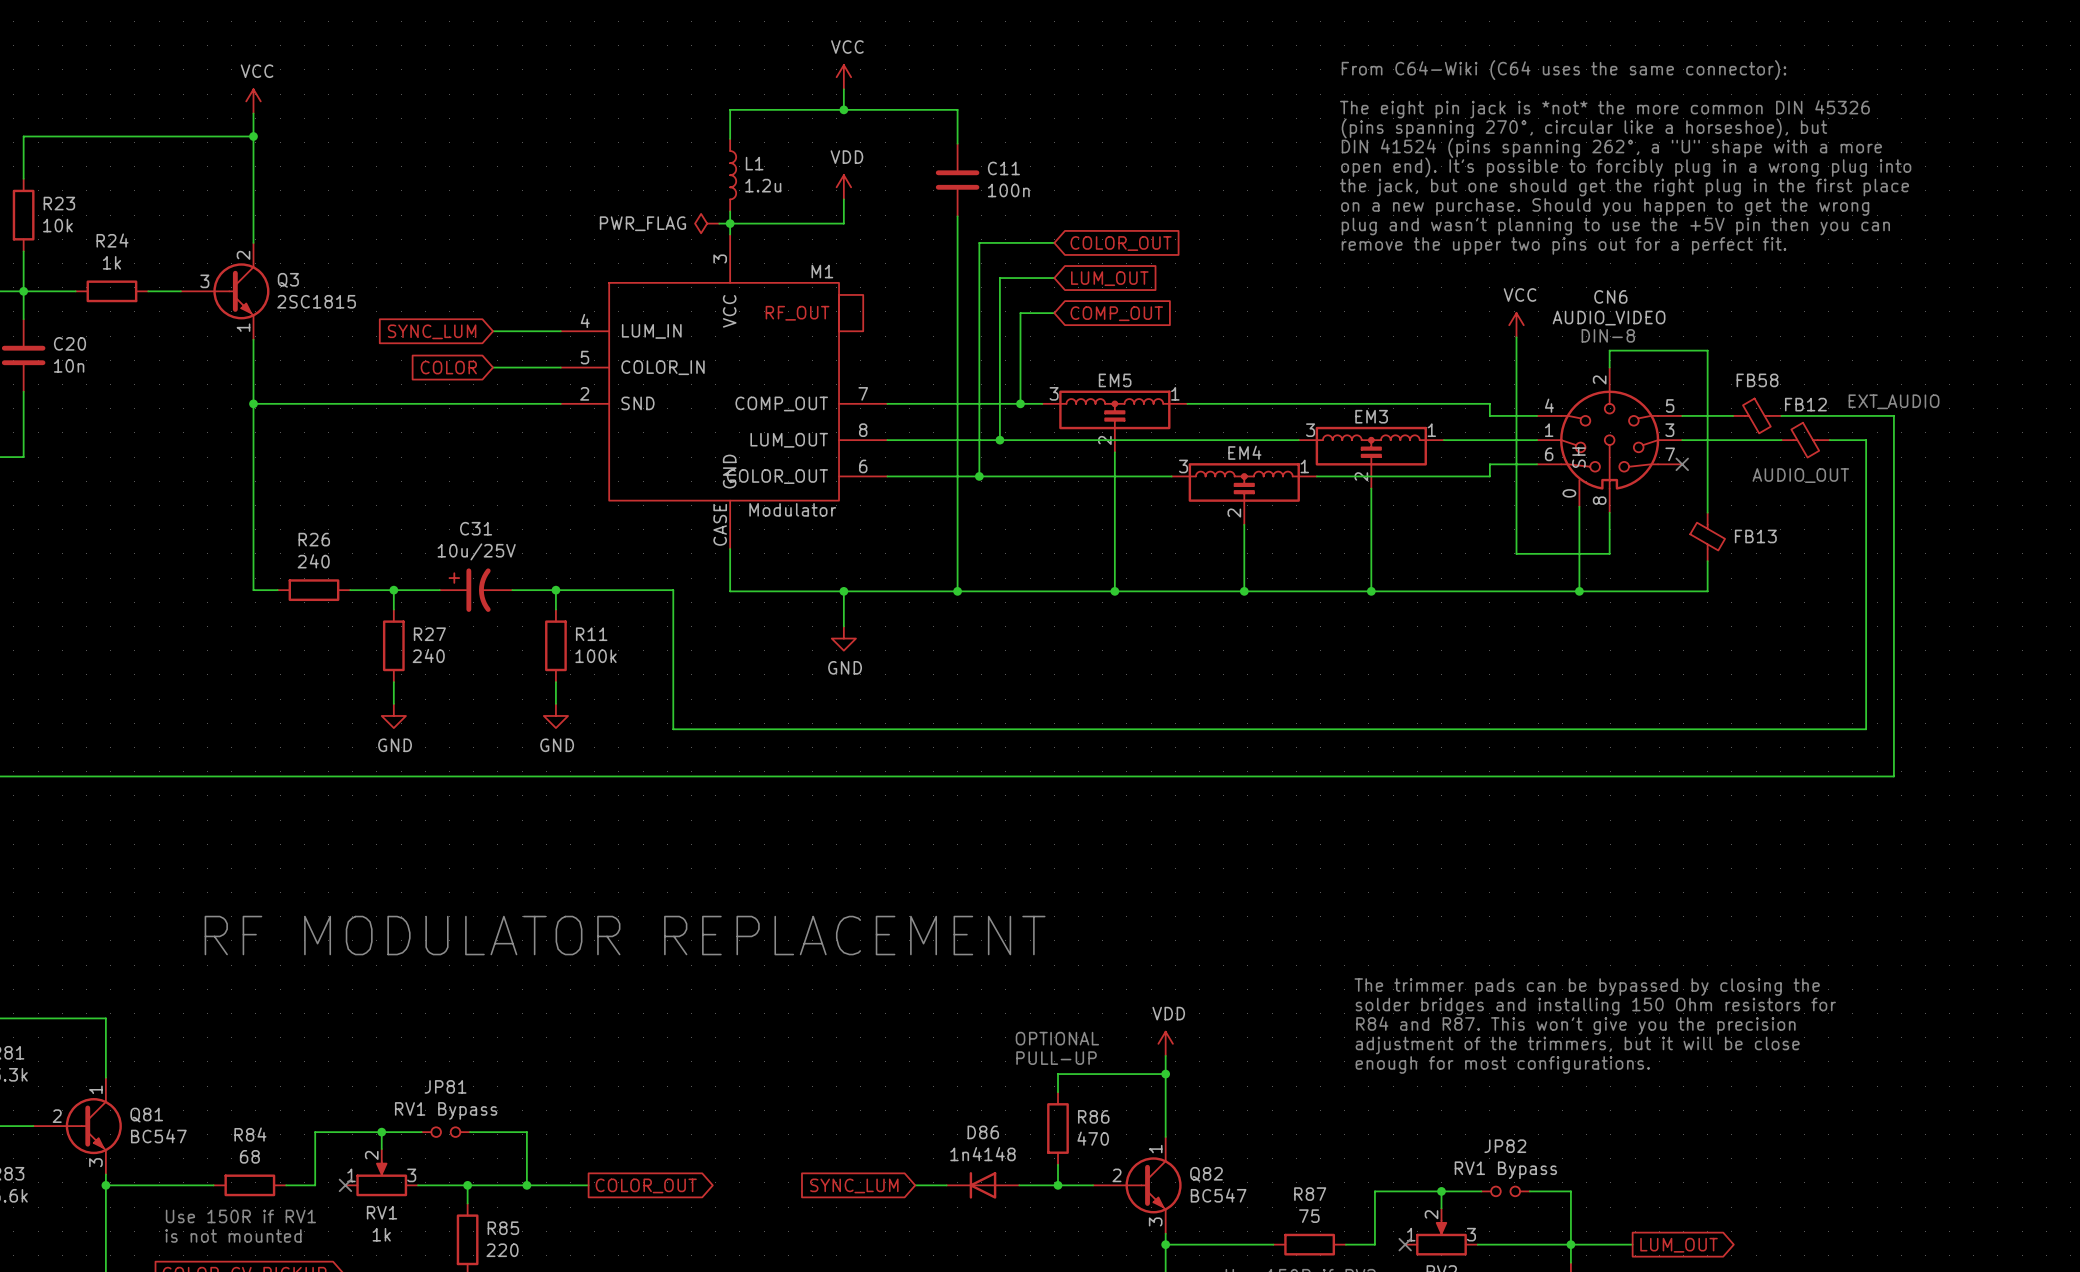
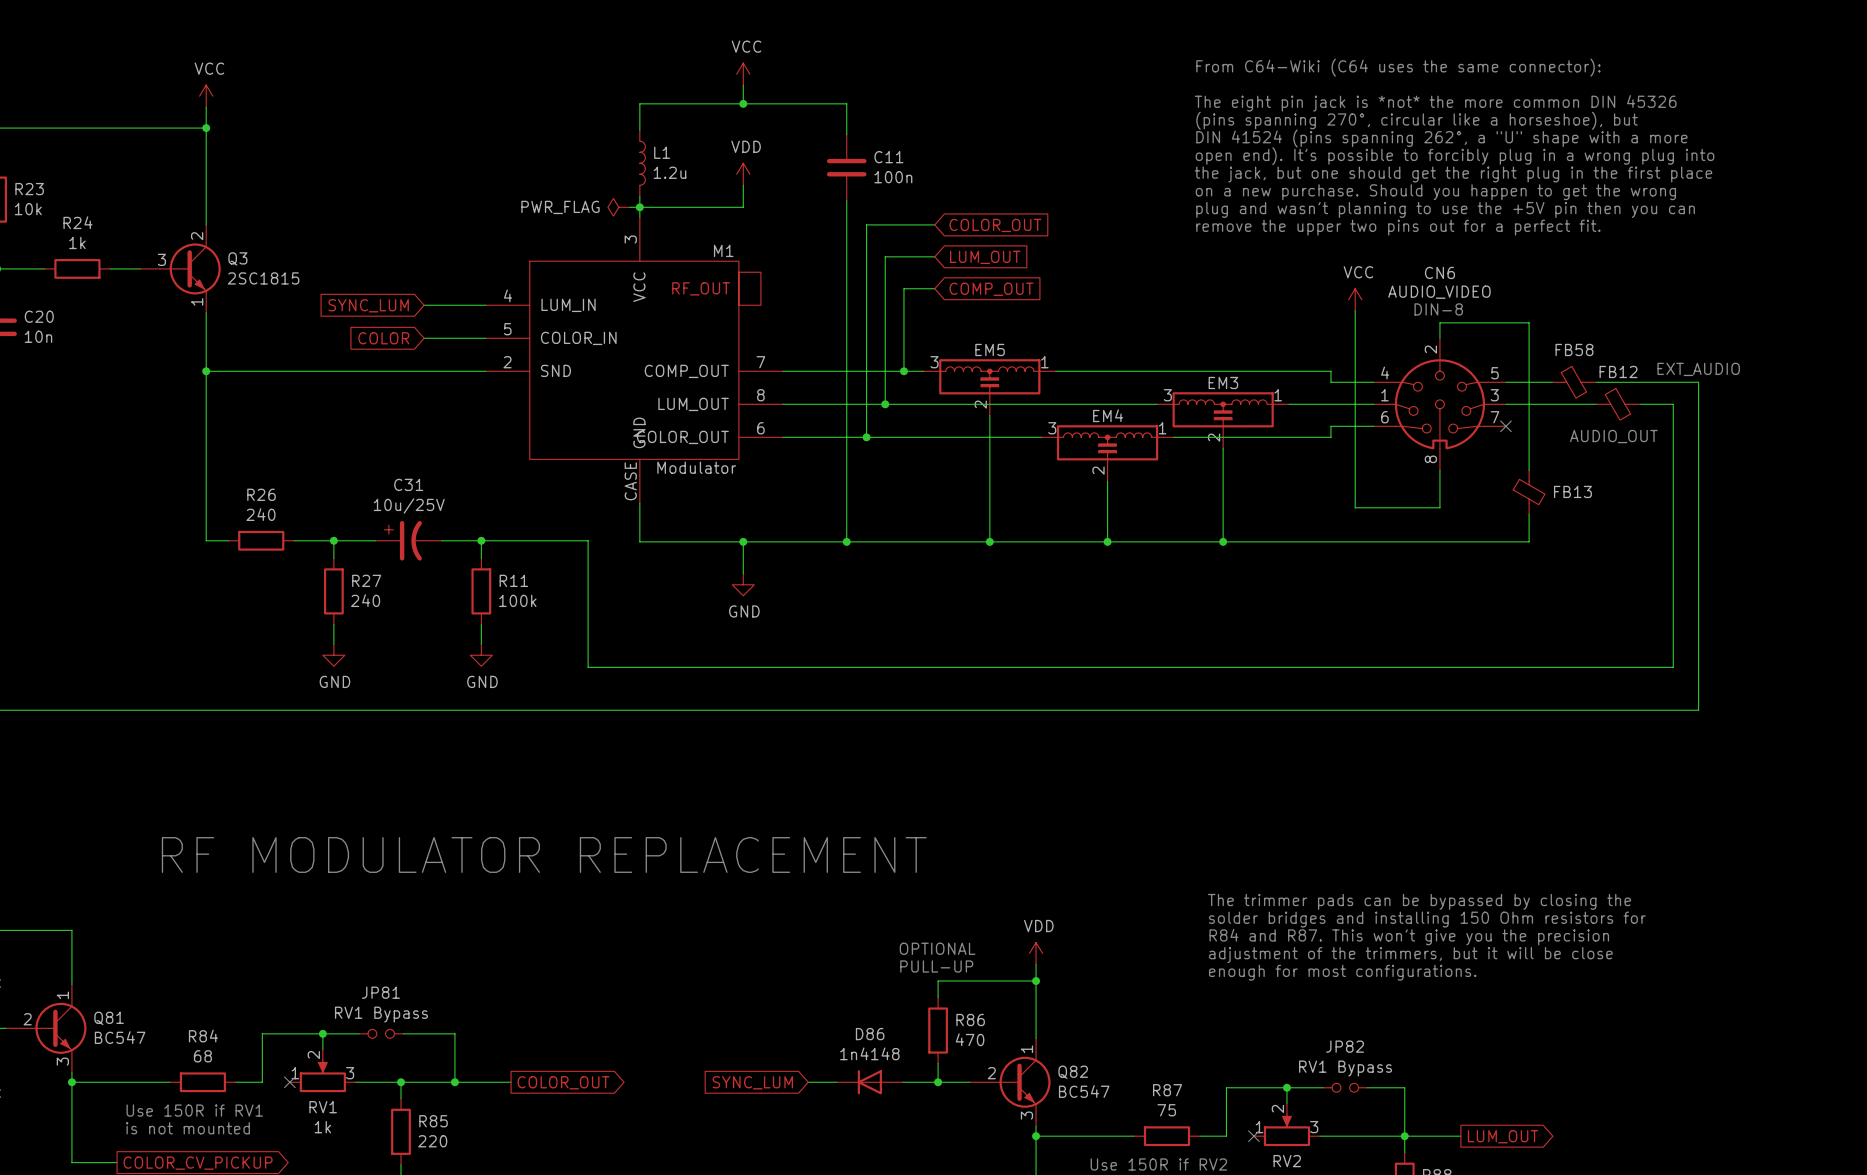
CN6 symbol: [1537, 367, 1683, 513] -> [1373, 338, 1506, 471]
wire: (1579, 506) (1579, 591) -> none
junction: (1579, 591) -> none

